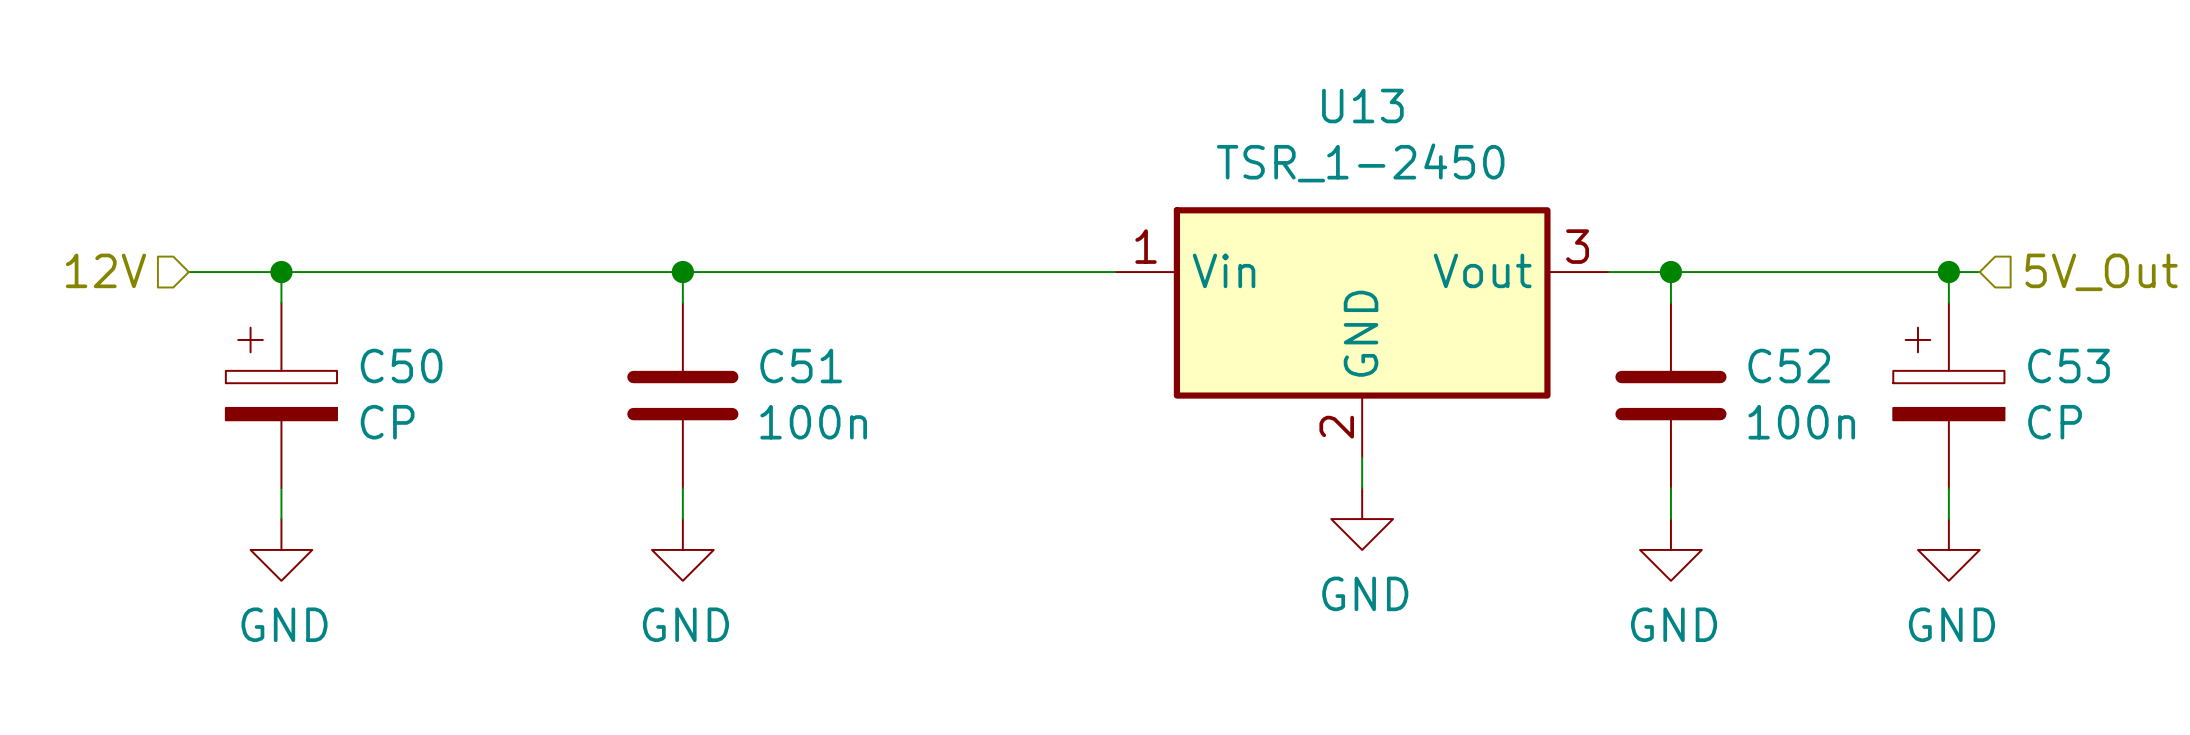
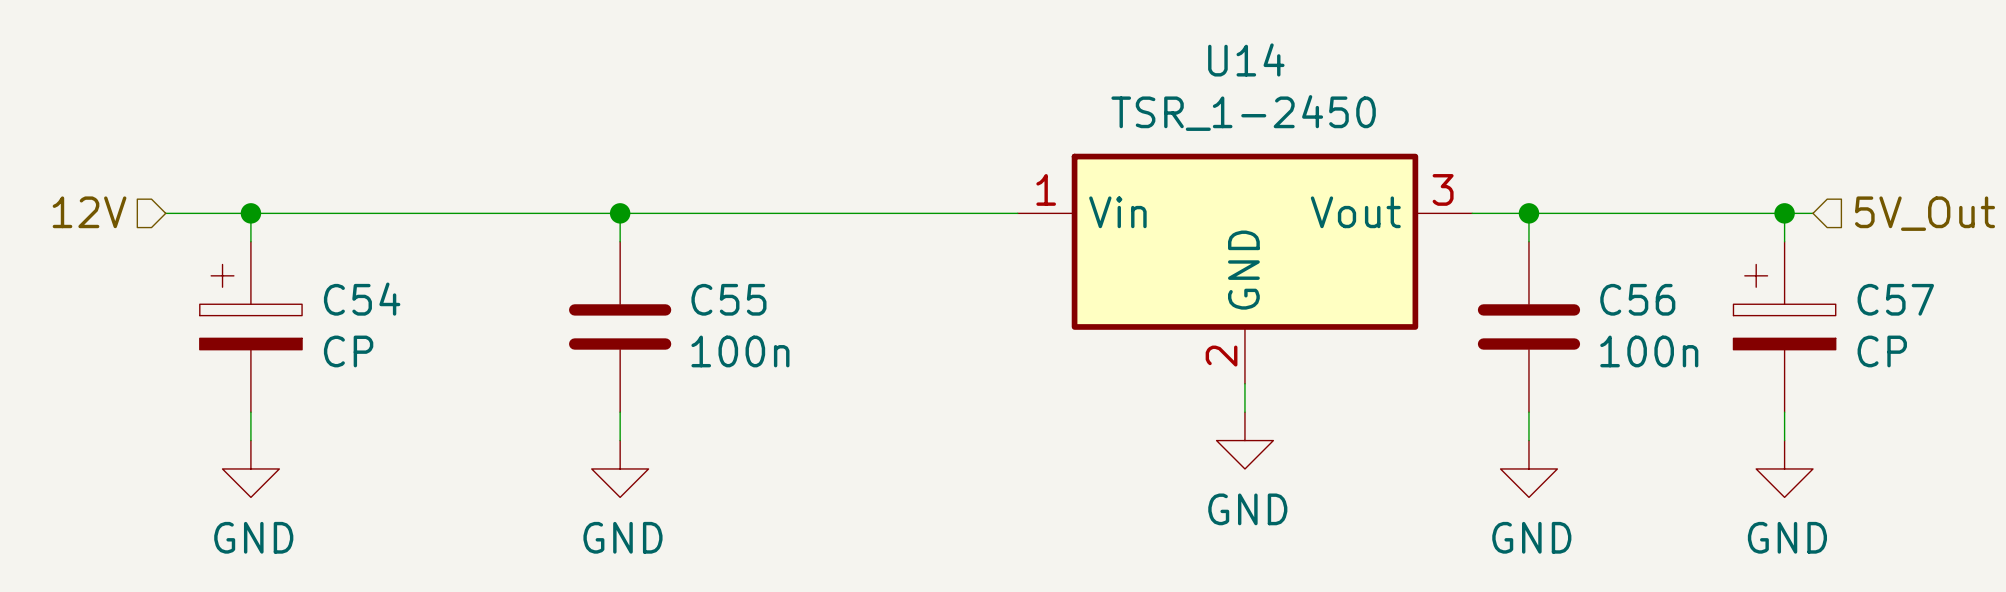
U13 name: U13 (1362, 106) -> U14 (1246, 59)
C50 name: C50 (401, 366) -> C54 (362, 299)
C51 name: C51 (801, 366) -> C55 (728, 299)
C52 name: C52 (1789, 366) -> C56 (1637, 299)
C53 name: C53 (2069, 366) -> C57 (1895, 299)

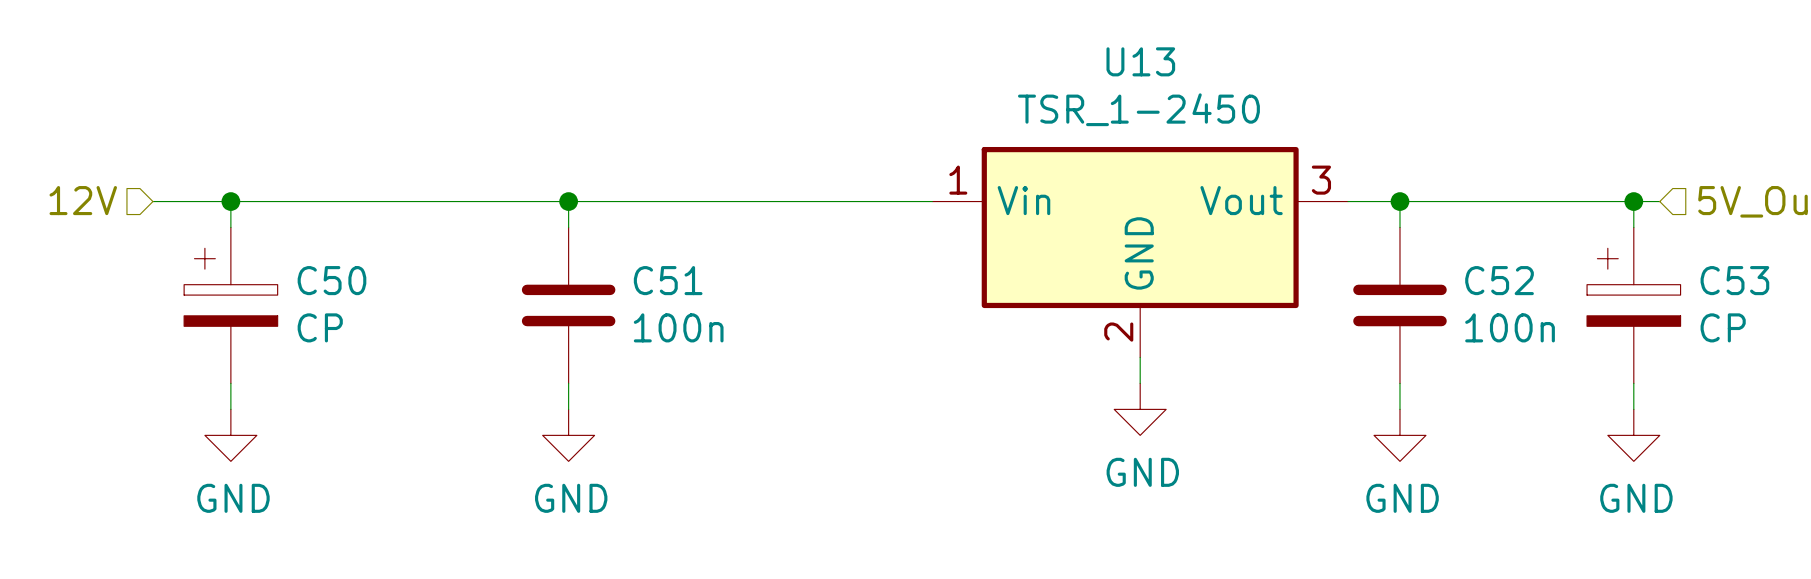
U14 name: U14 (1246, 59) -> U13 (1140, 61)
C54 name: C54 (362, 299) -> C50 (331, 280)
C55 name: C55 (728, 299) -> C51 (668, 280)
C56 name: C56 (1637, 299) -> C52 (1499, 280)
C57 name: C57 (1895, 299) -> C53 (1734, 280)

